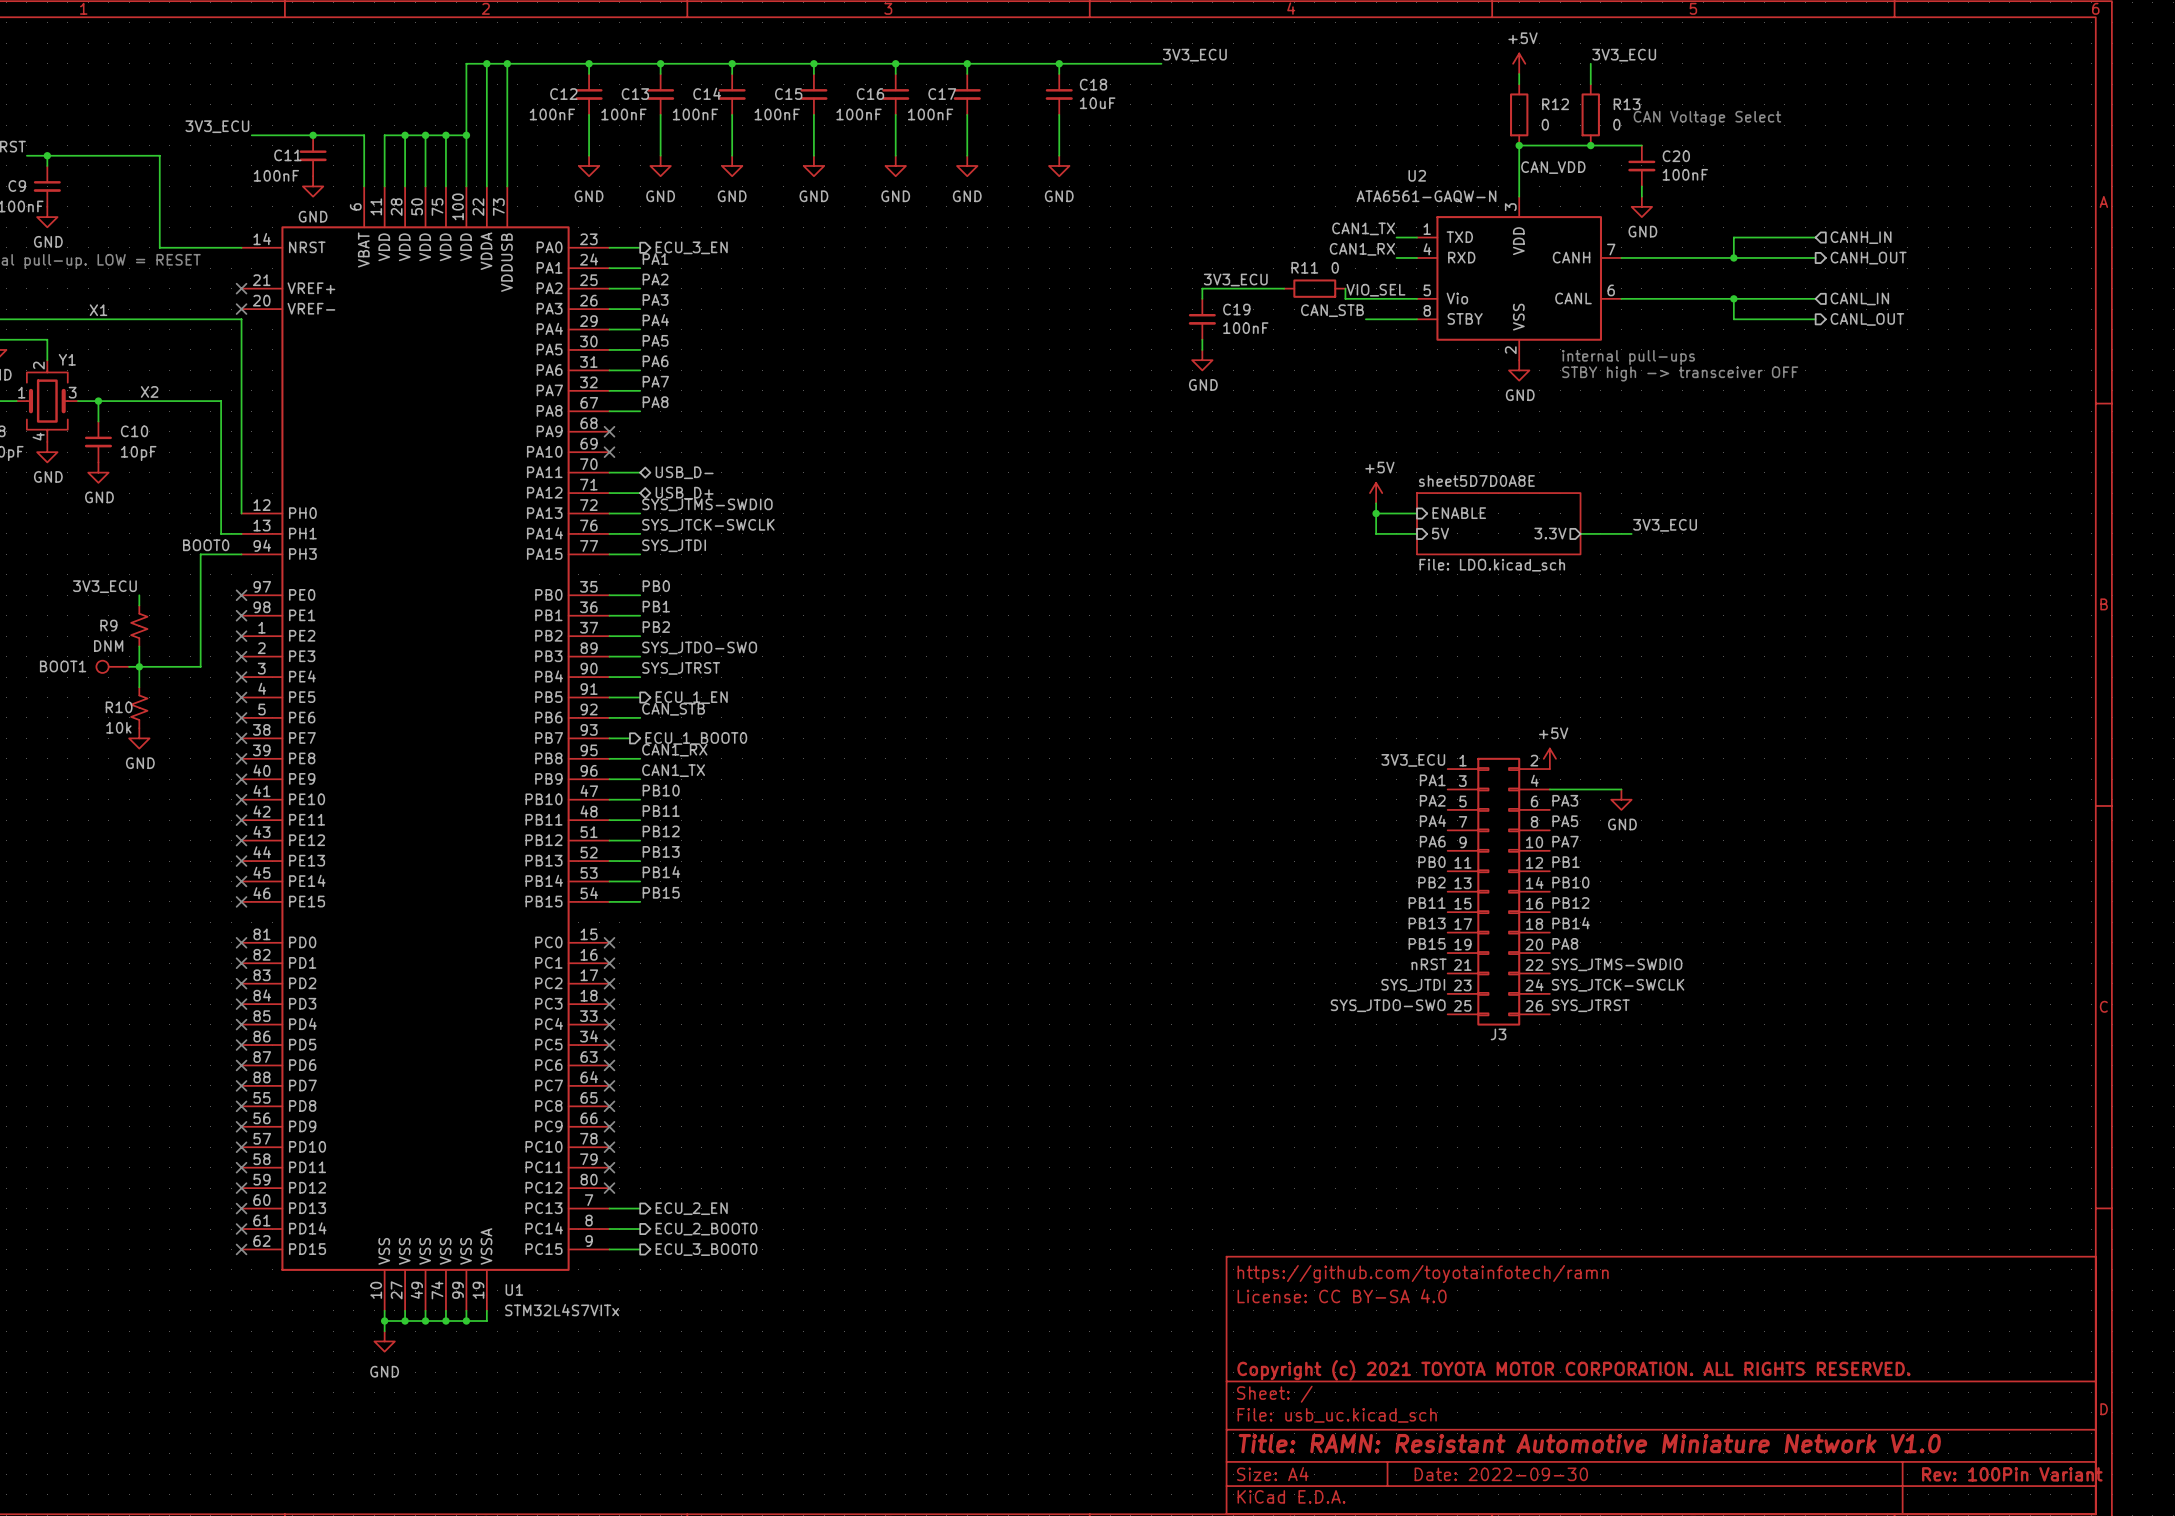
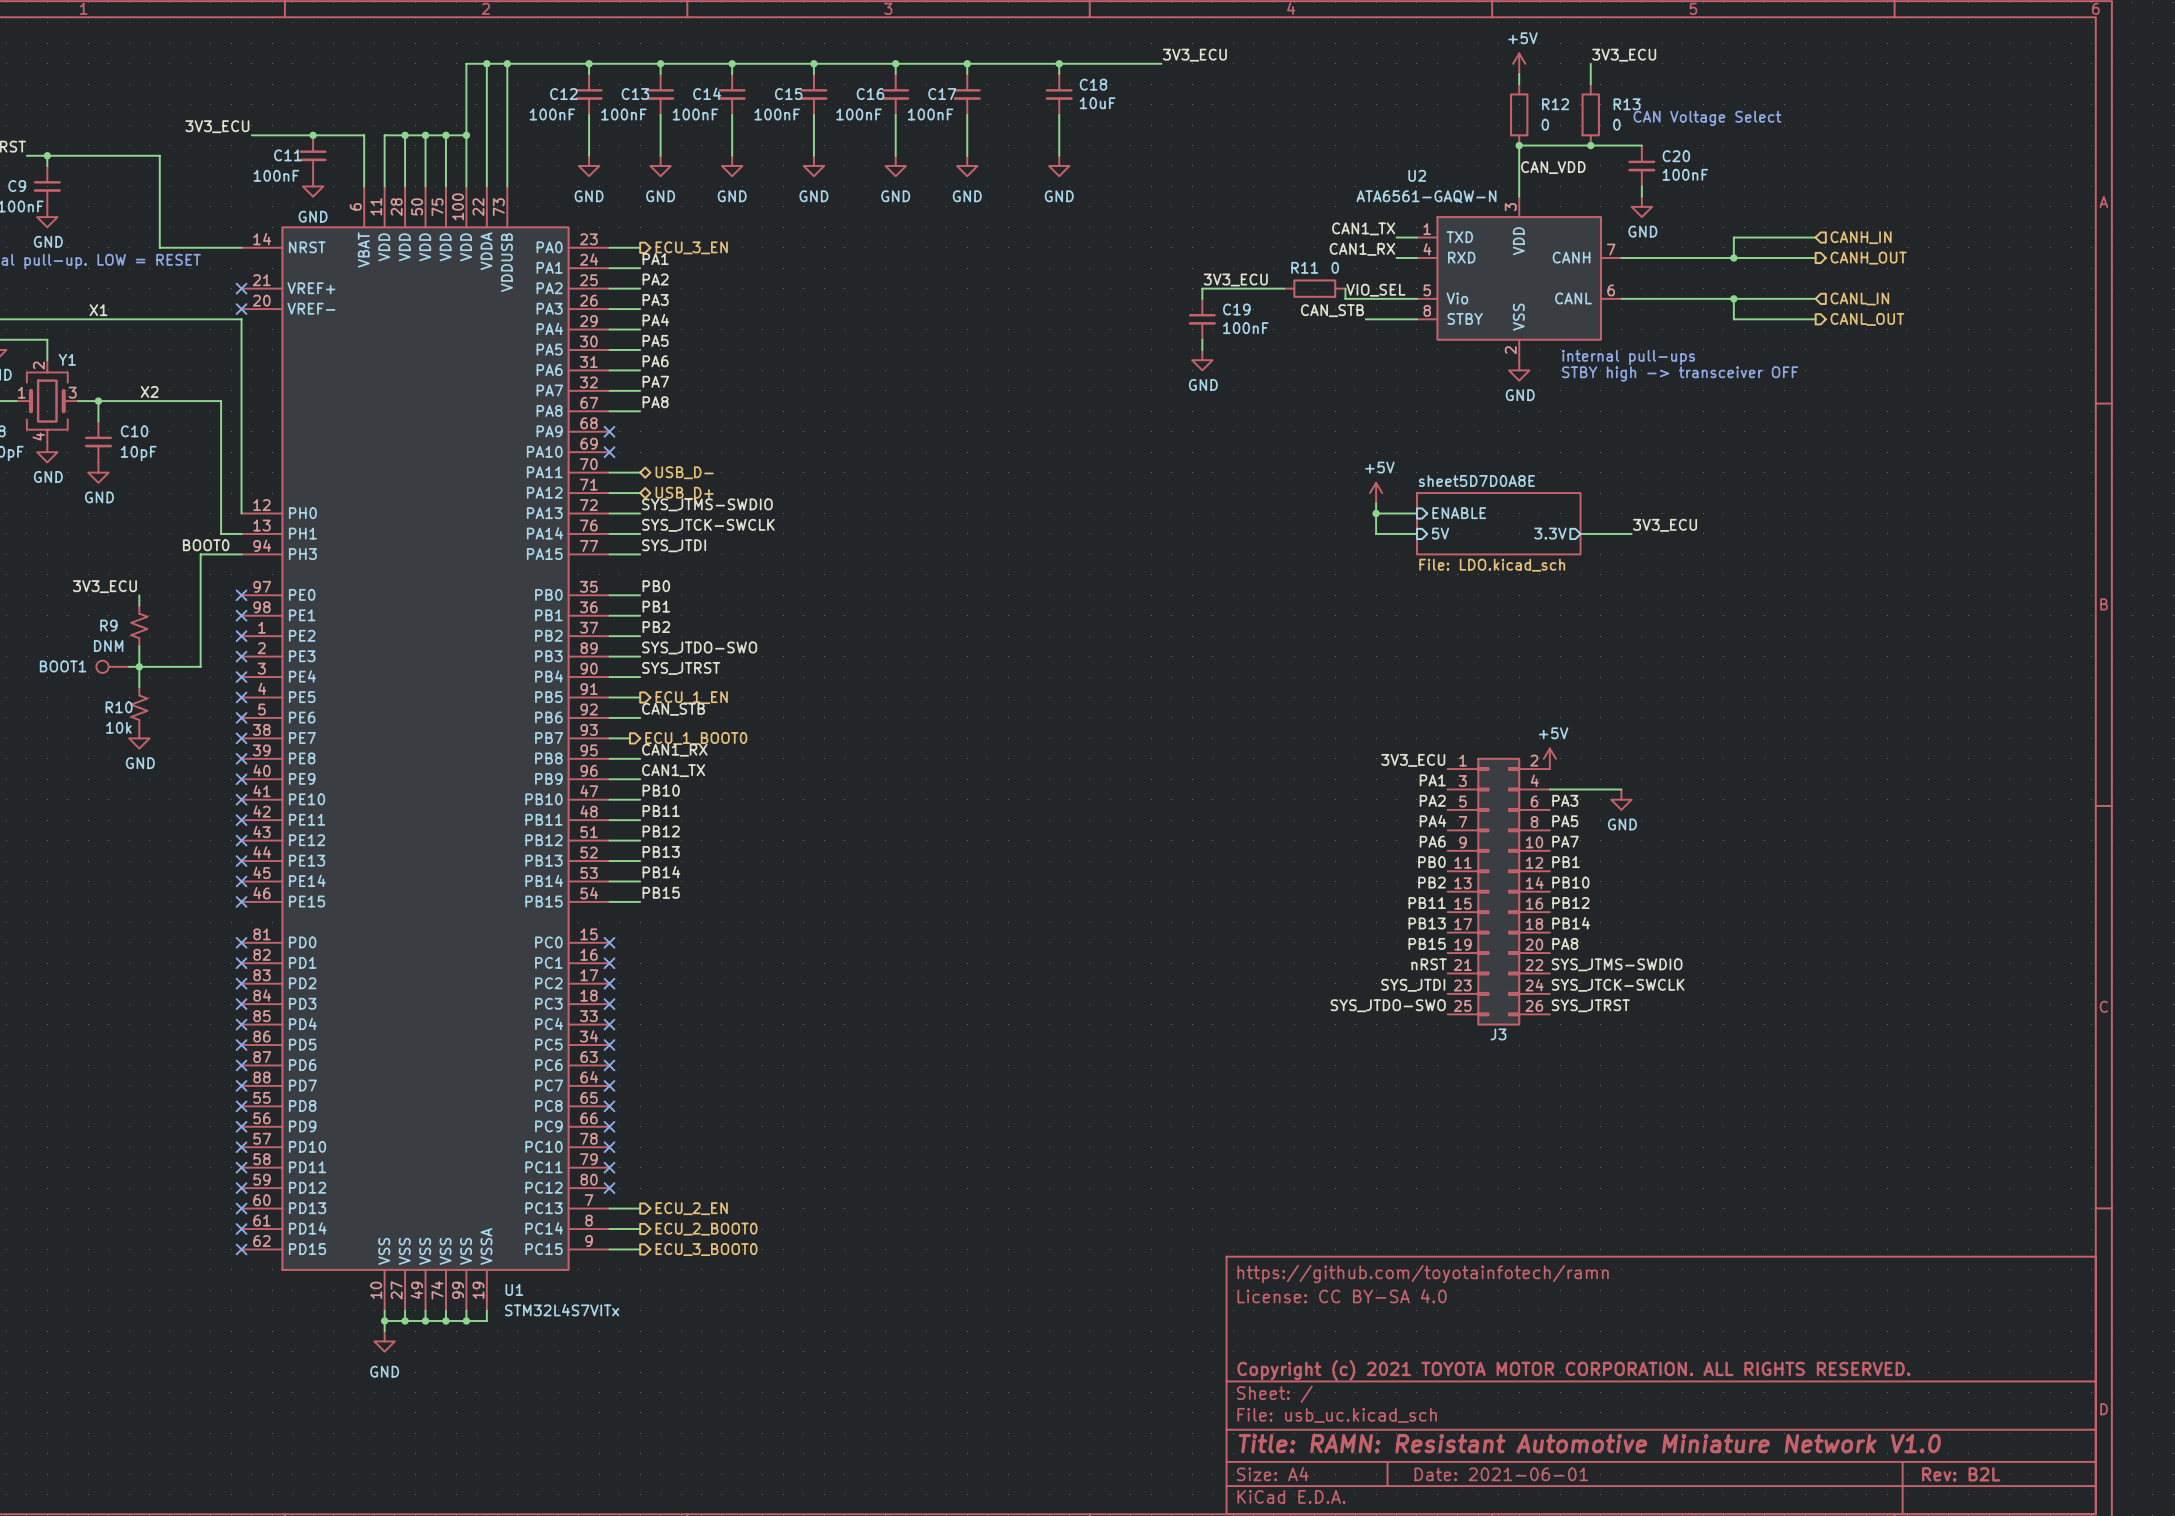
title block: Date: 2022-09-30 (1501, 1474) -> Date: 2021-06-01 (1501, 1474)
title block: Rev: 100Pin Variant (2012, 1474) -> Rev: B2L (1961, 1474)

